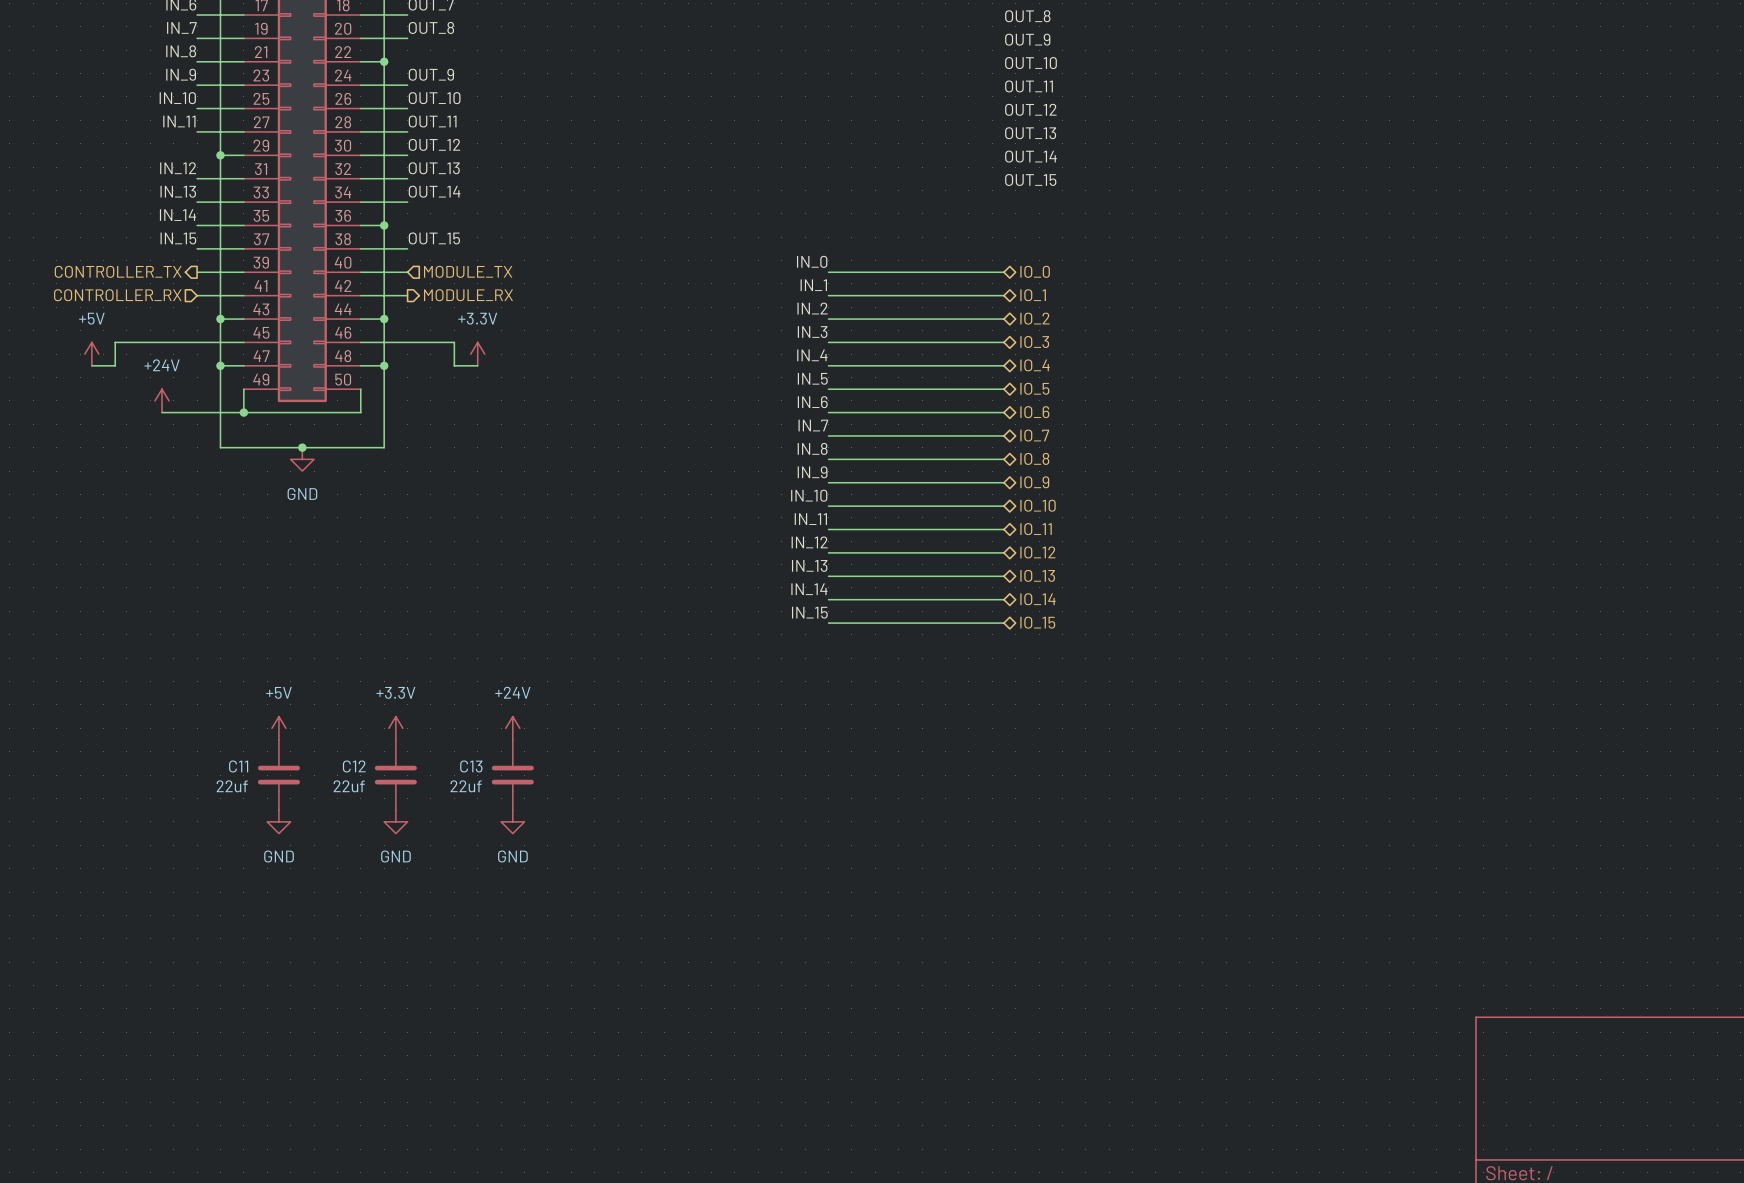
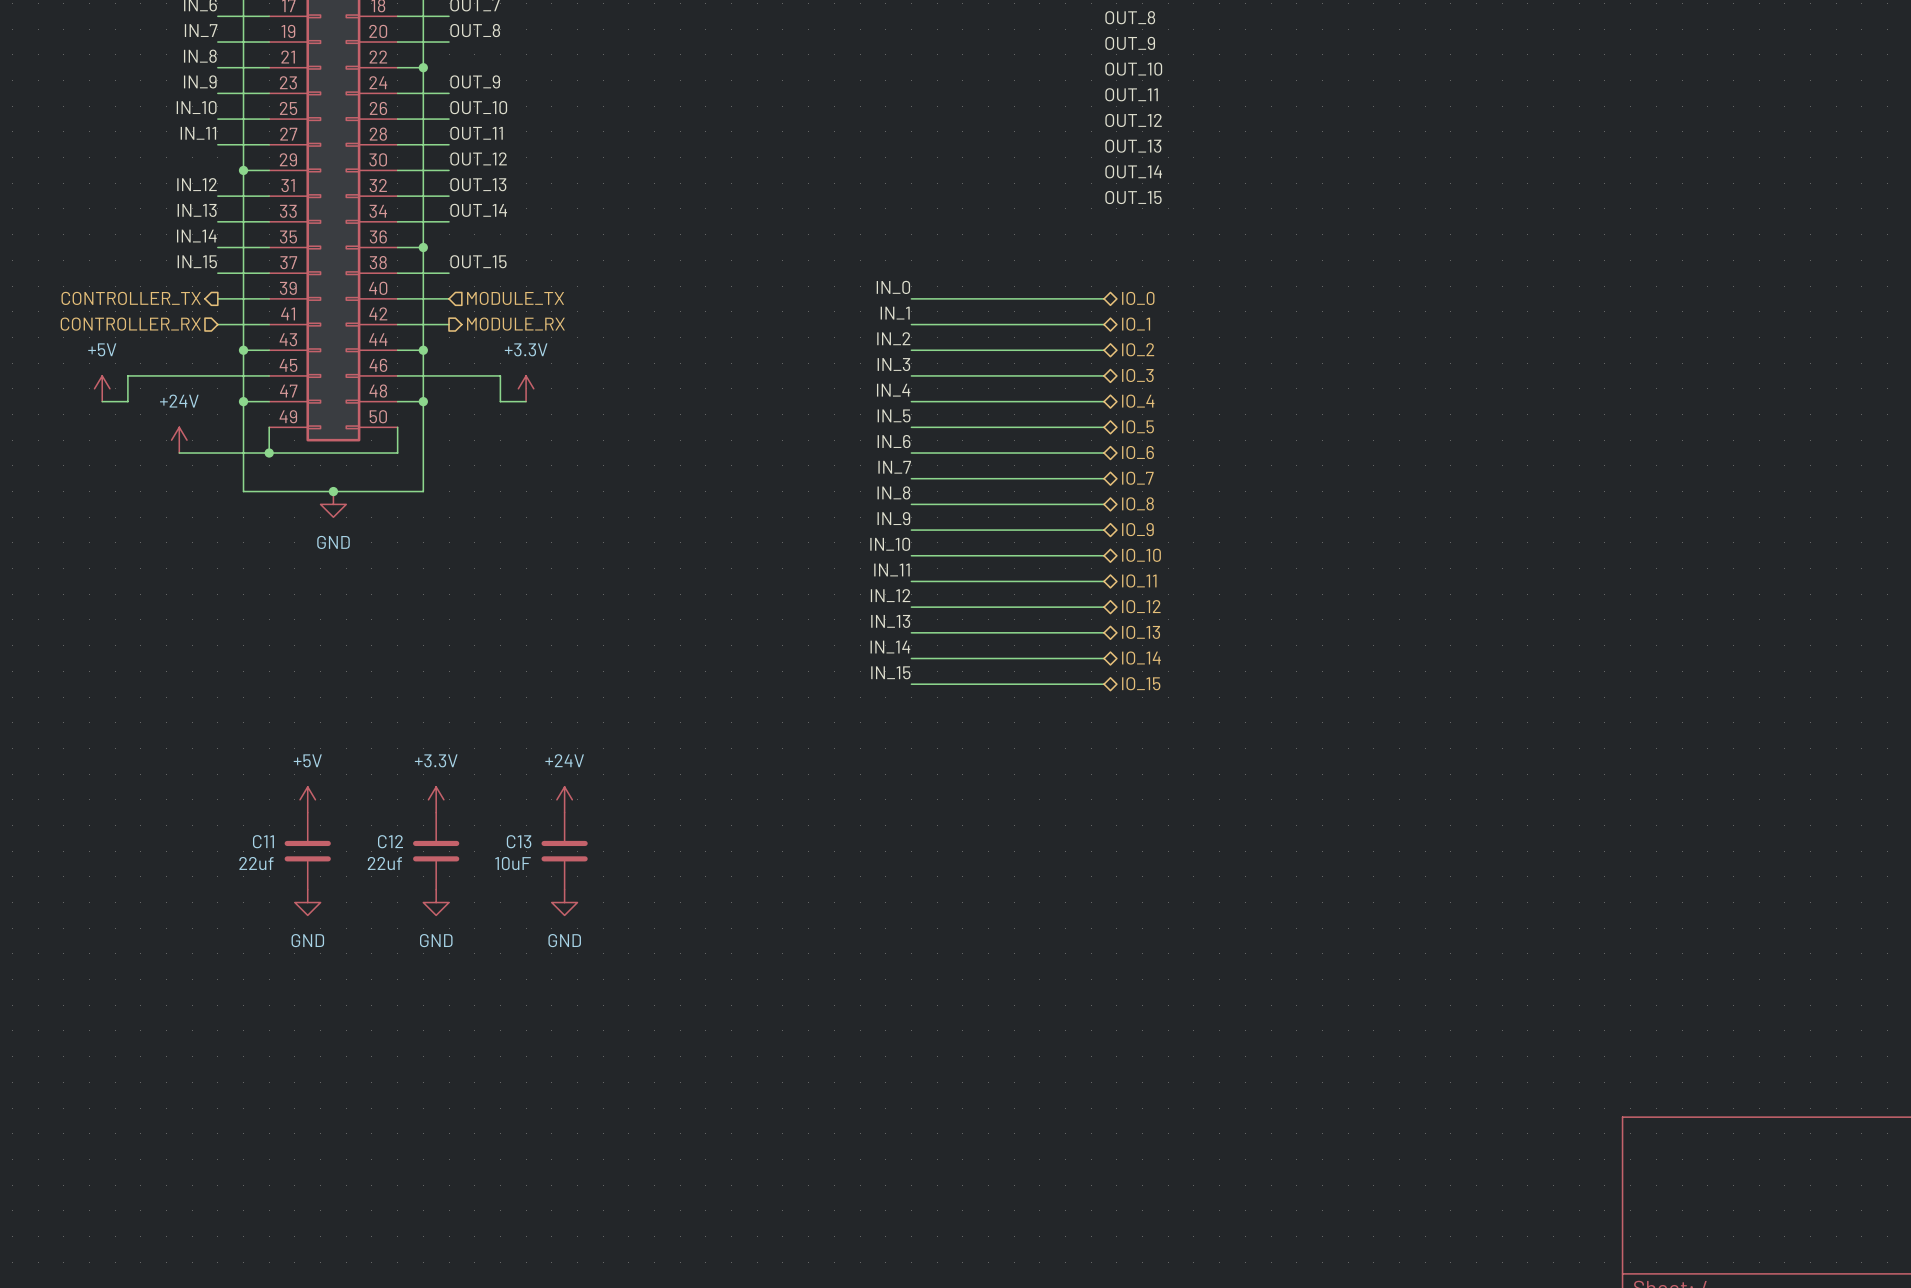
C13 value: 22uf (466, 786) -> 10uF (513, 863)

